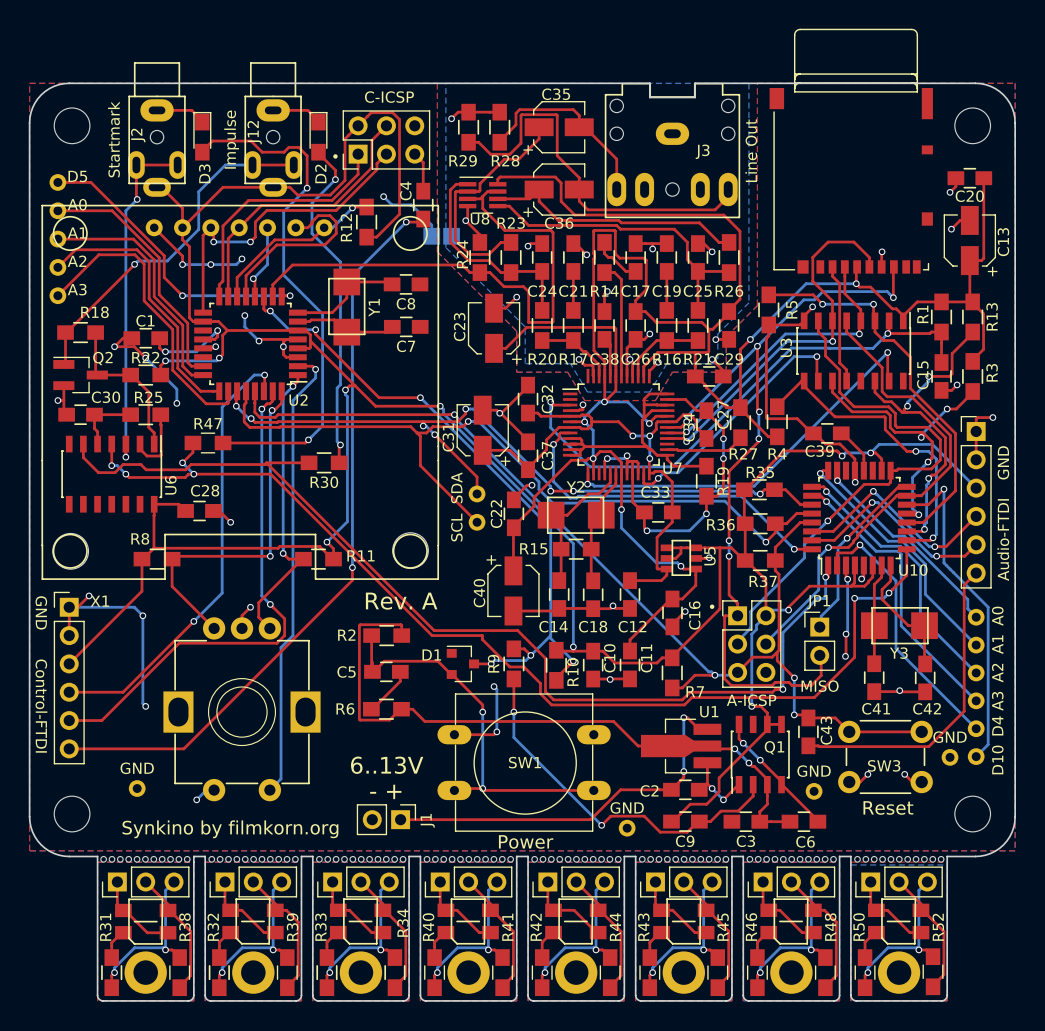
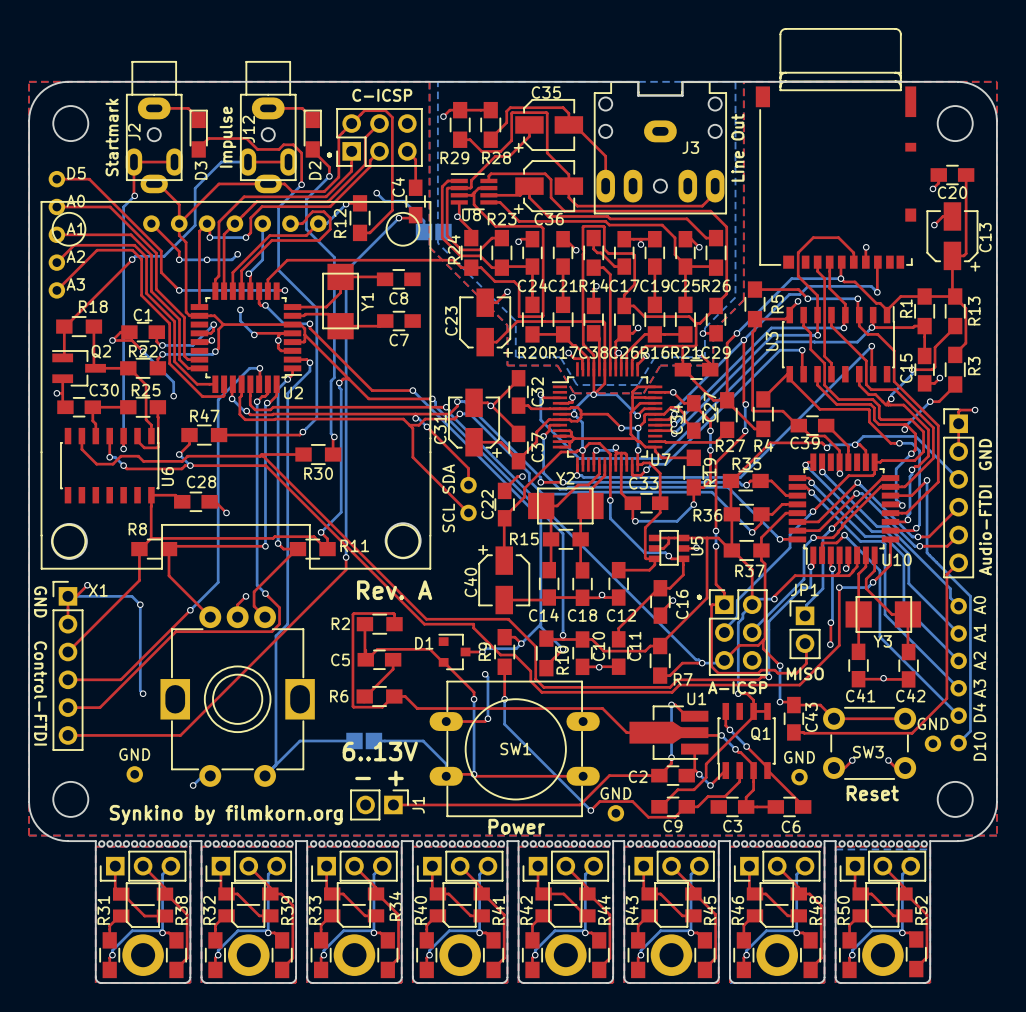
via: none -> (673, 392)
bottom track: none -> (354, 741) (299, 741) (275, 764)
part: none -> (354, 741)
bottom track: none -> (373, 741) (423, 741) (446, 764) (446, 776)
part: none -> (373, 741)

